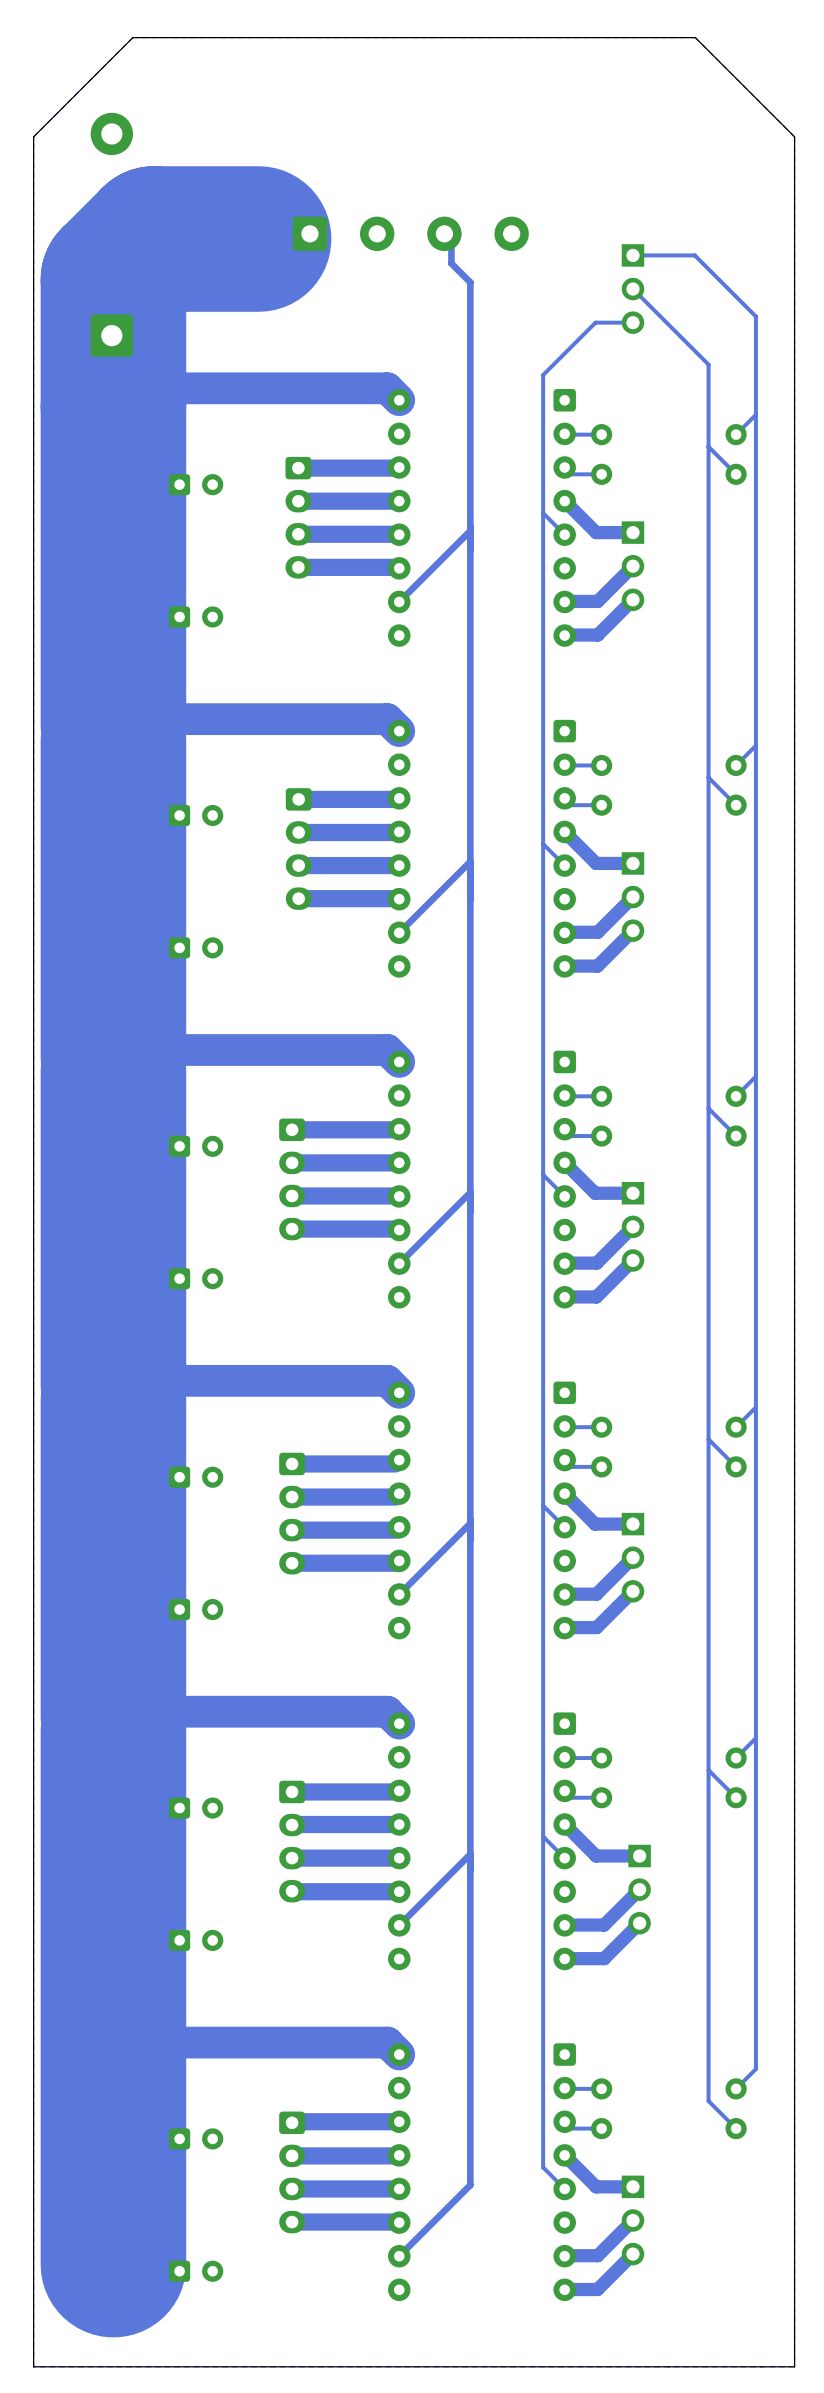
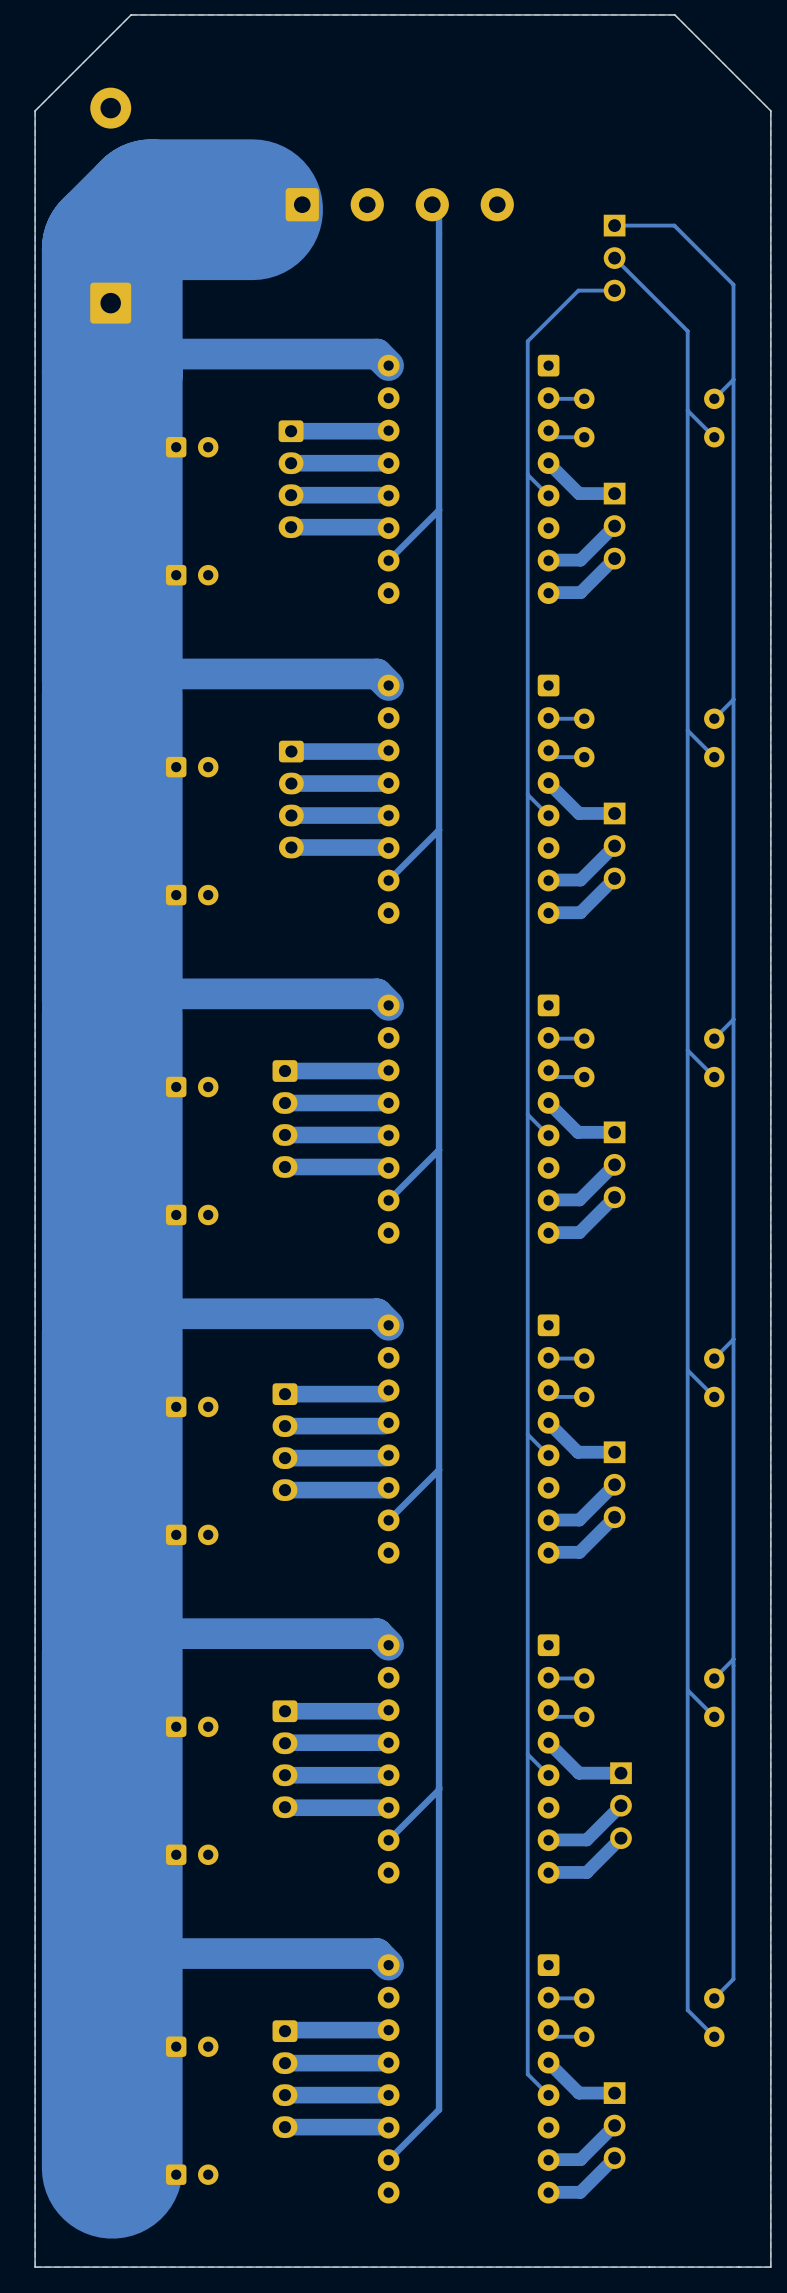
bottom track: (451, 263) (470, 282) (470, 2185) (451, 2204) -> (439, 233) (439, 2109)
bottom track: (470, 530) (451, 549) -> none
bottom track: (470, 861) (451, 880) -> none
bottom track: (470, 1192) (451, 1211) -> none
bottom track: (470, 1523) (451, 1542) -> none
bottom track: (470, 1854) (451, 1873) -> none

